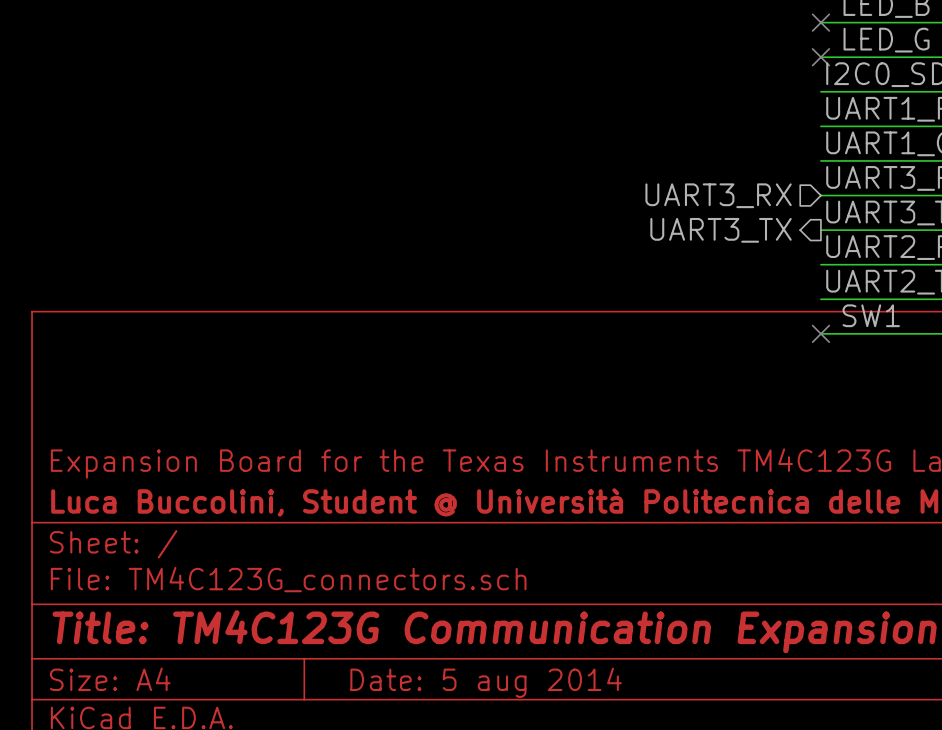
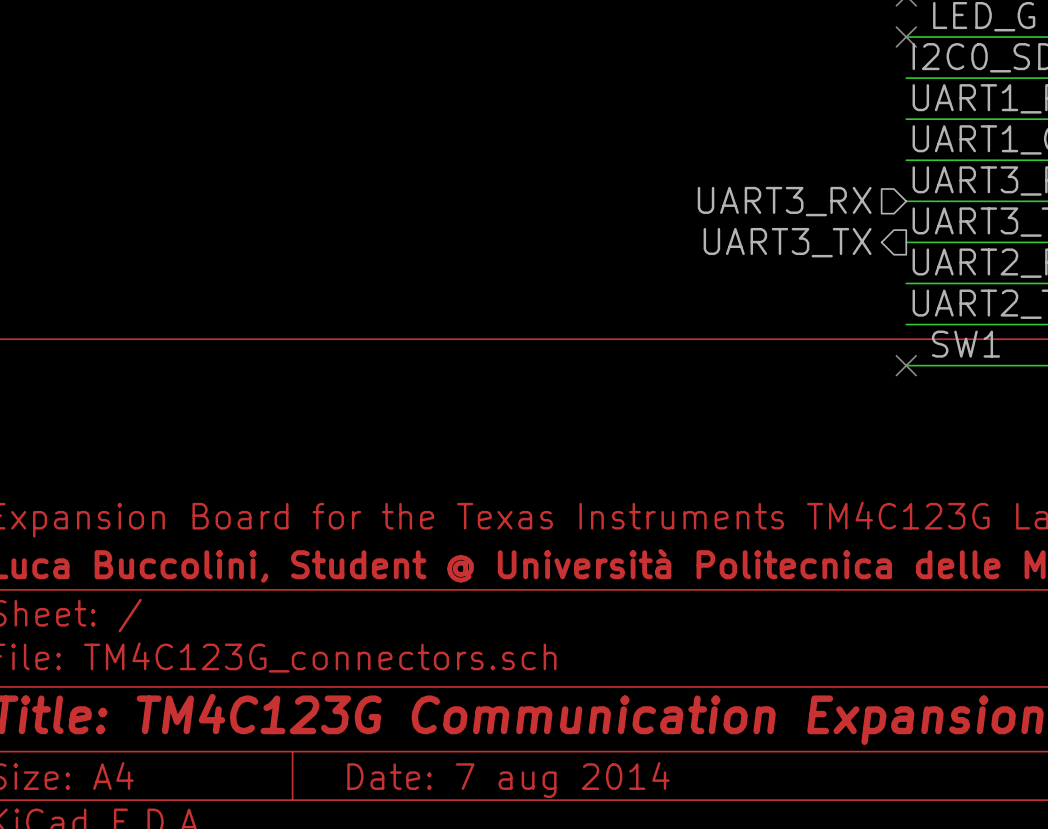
title block: Date: 5 aug 2014 (486, 682) -> Date: 7 aug 2014 (508, 780)

